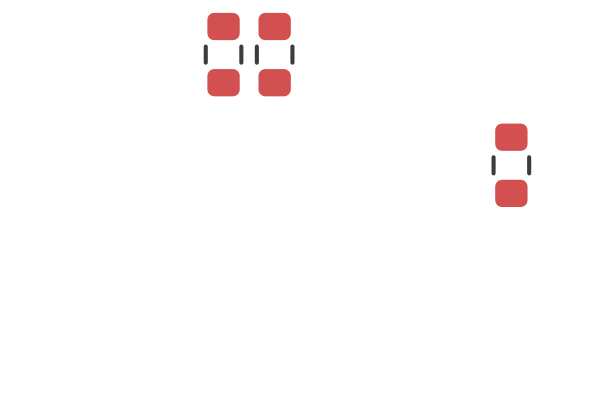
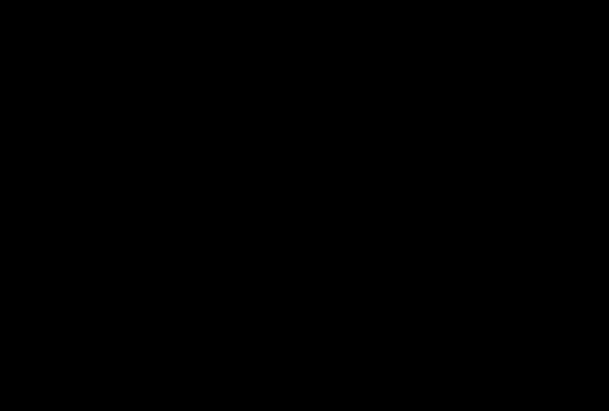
part: (223, 54) -> none
part: (274, 54) -> none
part: (511, 165) -> none

